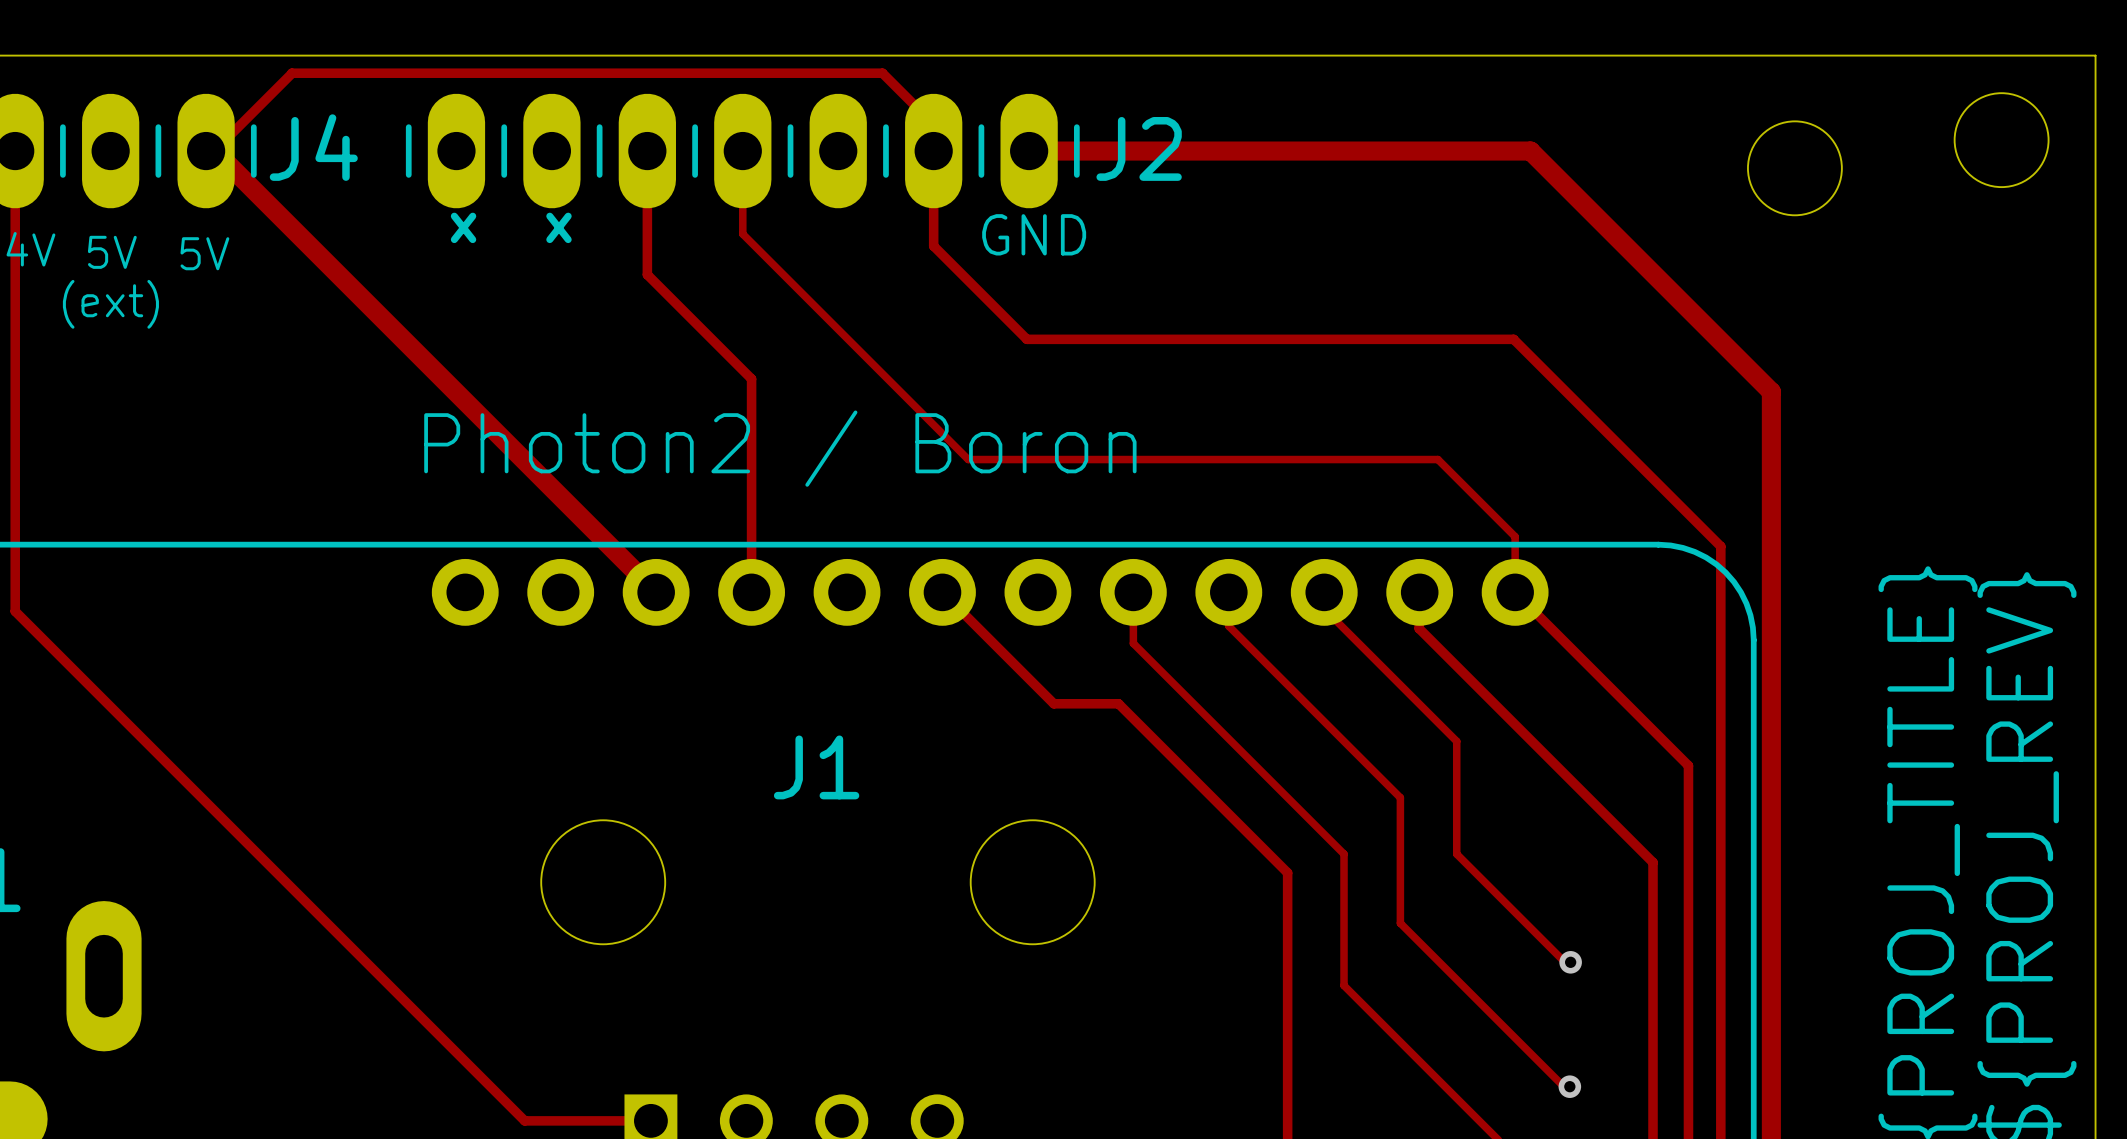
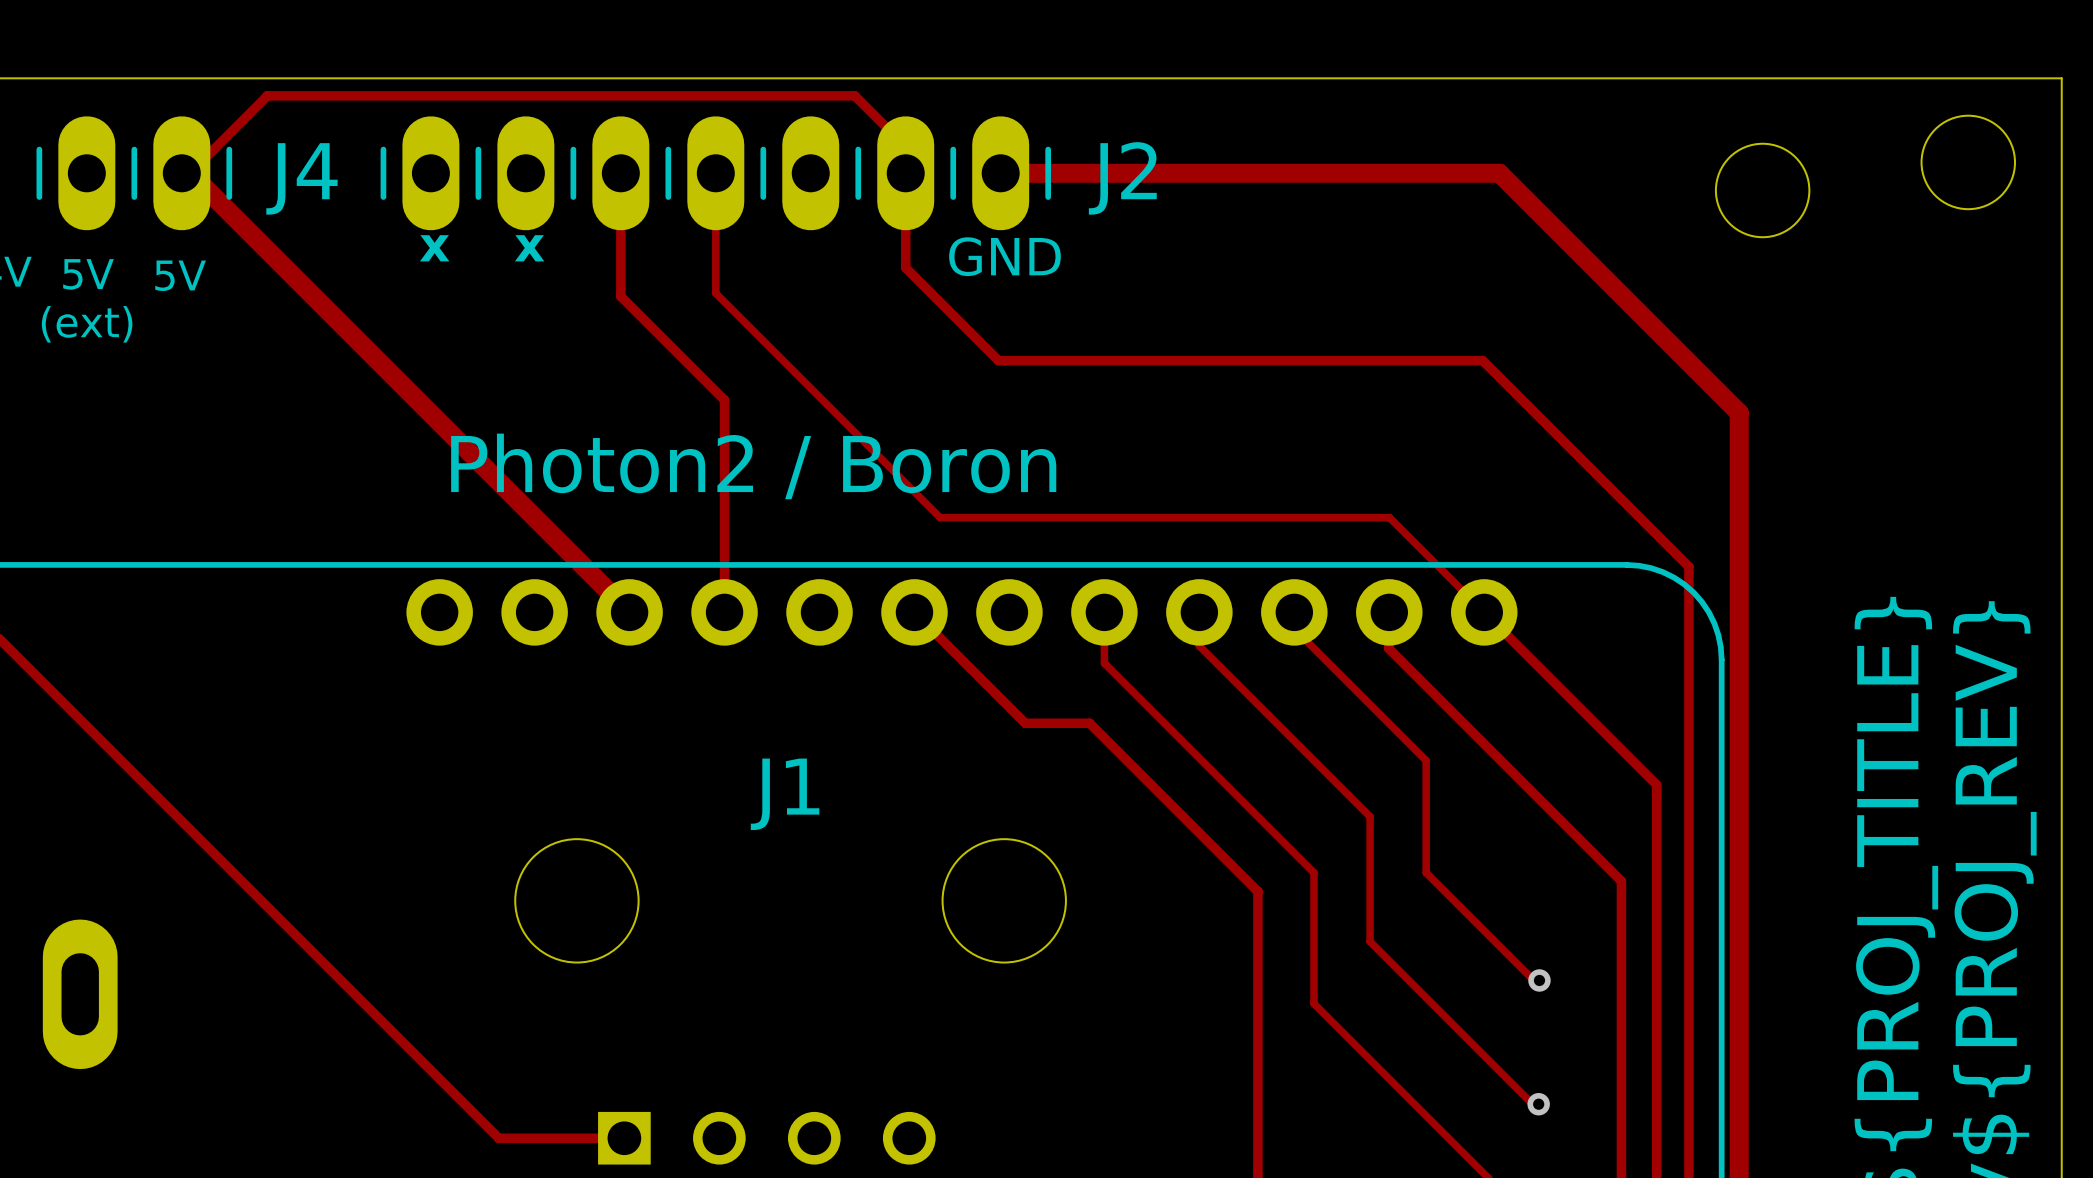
track: (742, 234) (968, 459) (1437, 459) (1515, 536) (1515, 592) -> (715, 255) (715, 293) (940, 517) (1389, 517) (1484, 612)

